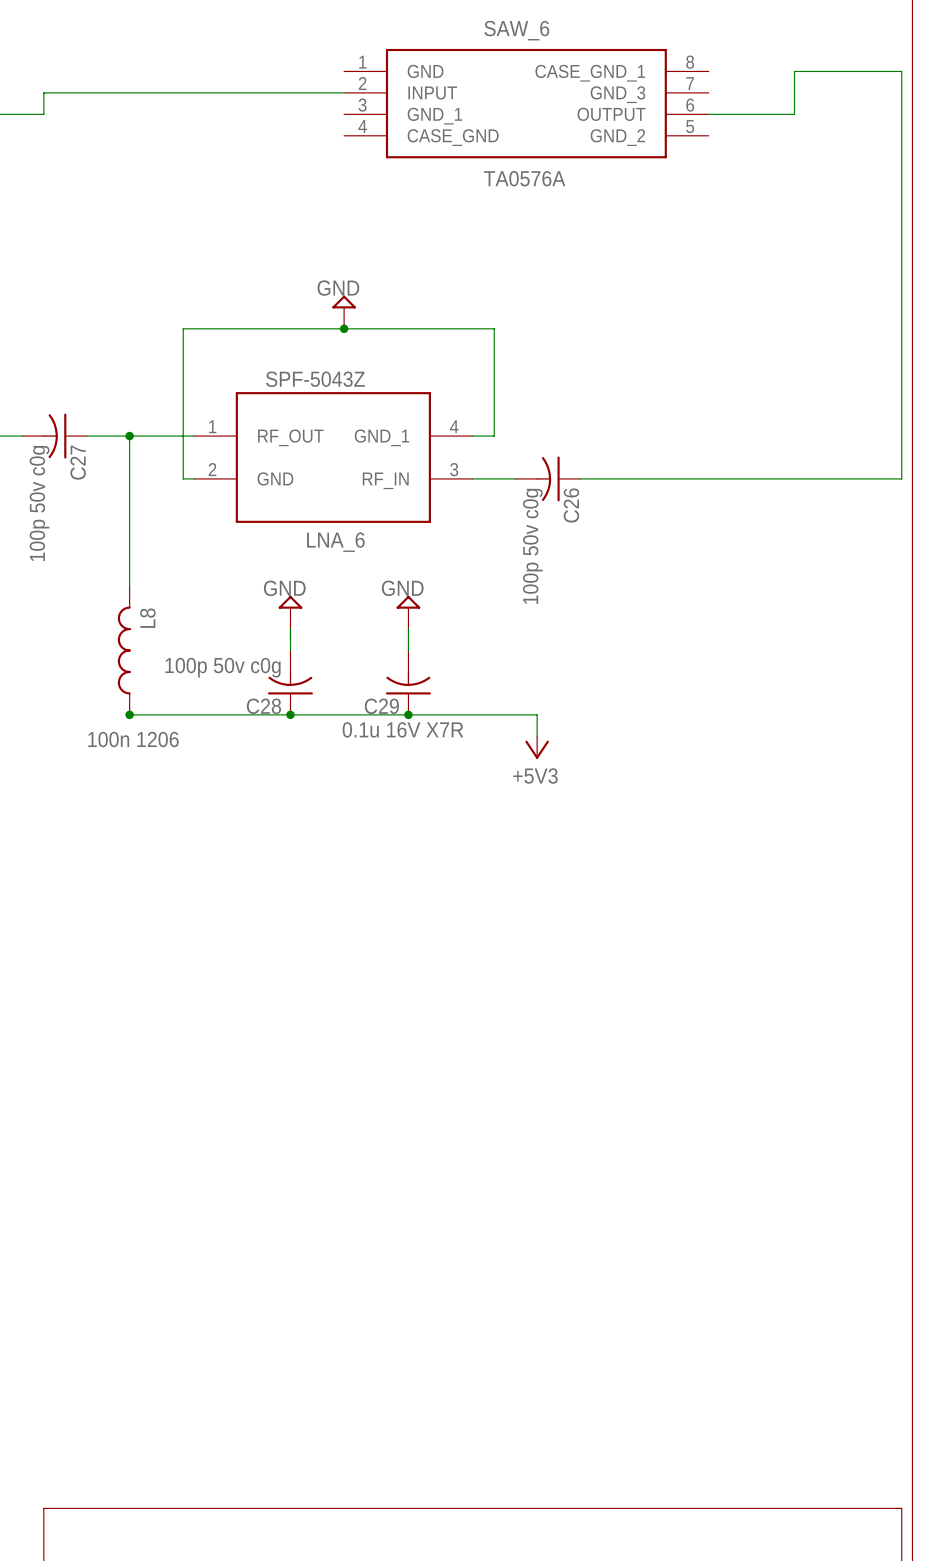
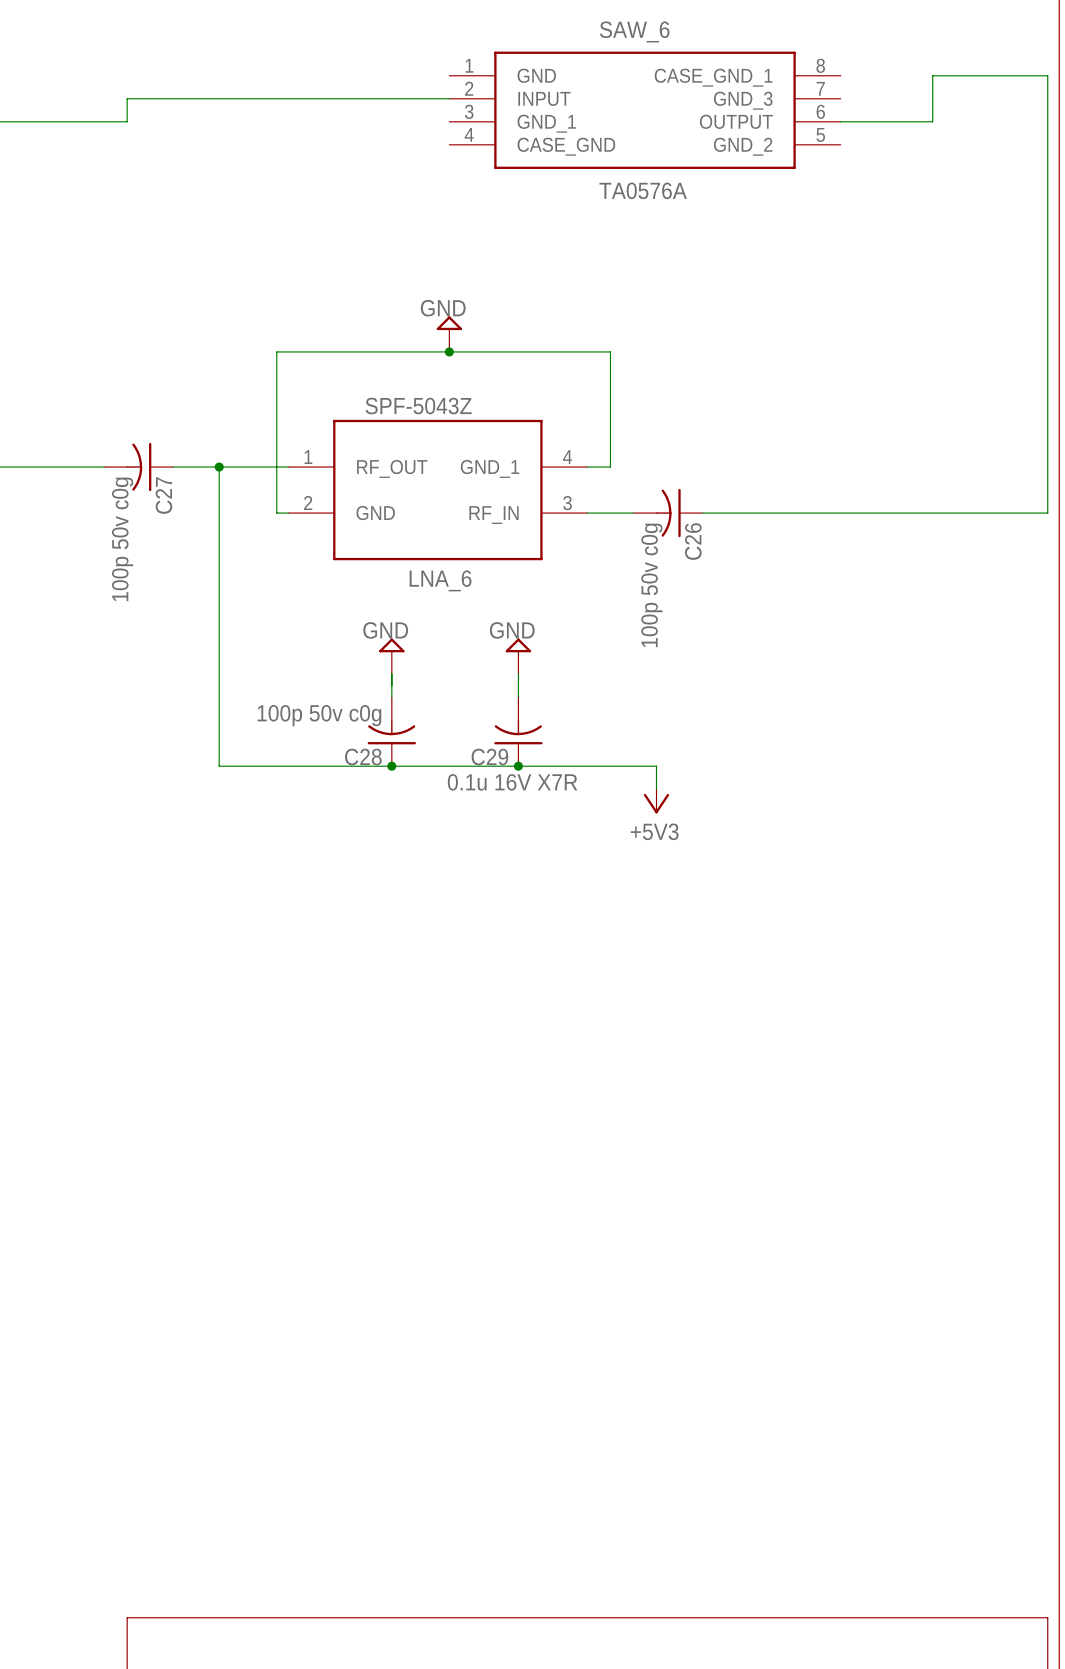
wire: none -> (219, 628) (219, 766)
L8: 100n 1206 (124, 650) -> none
junction: (129, 714) -> none

